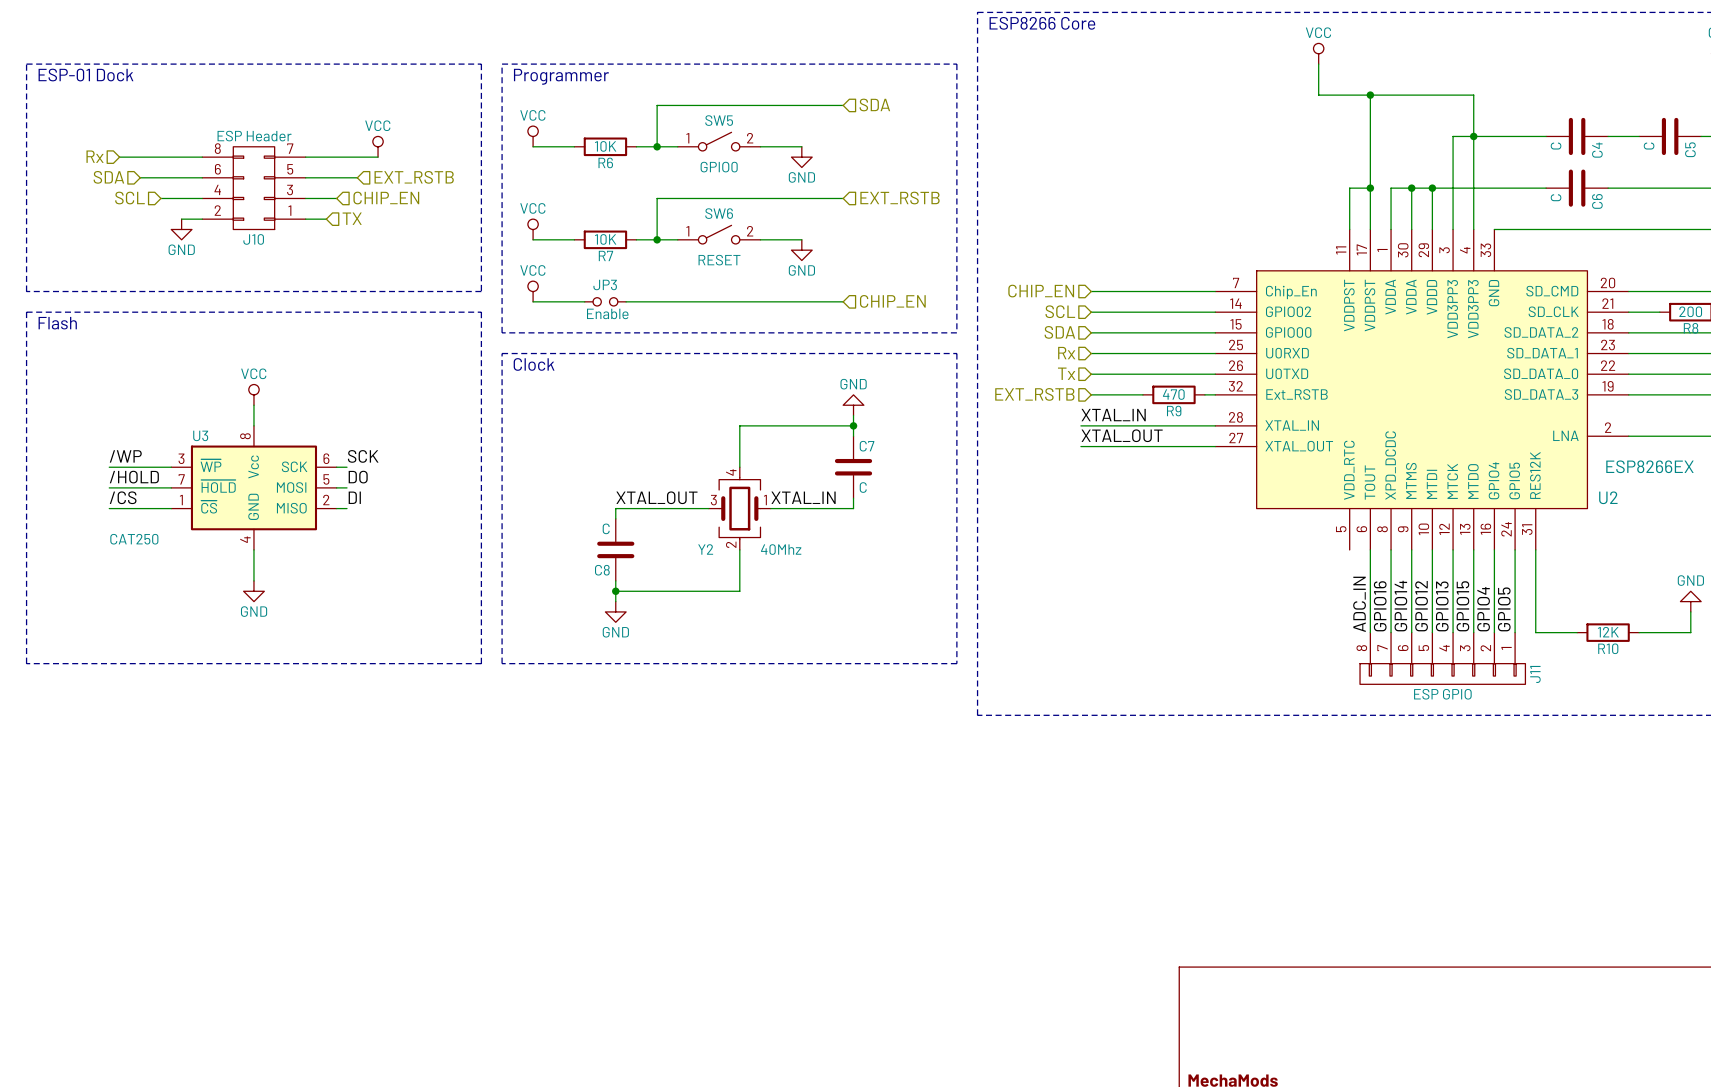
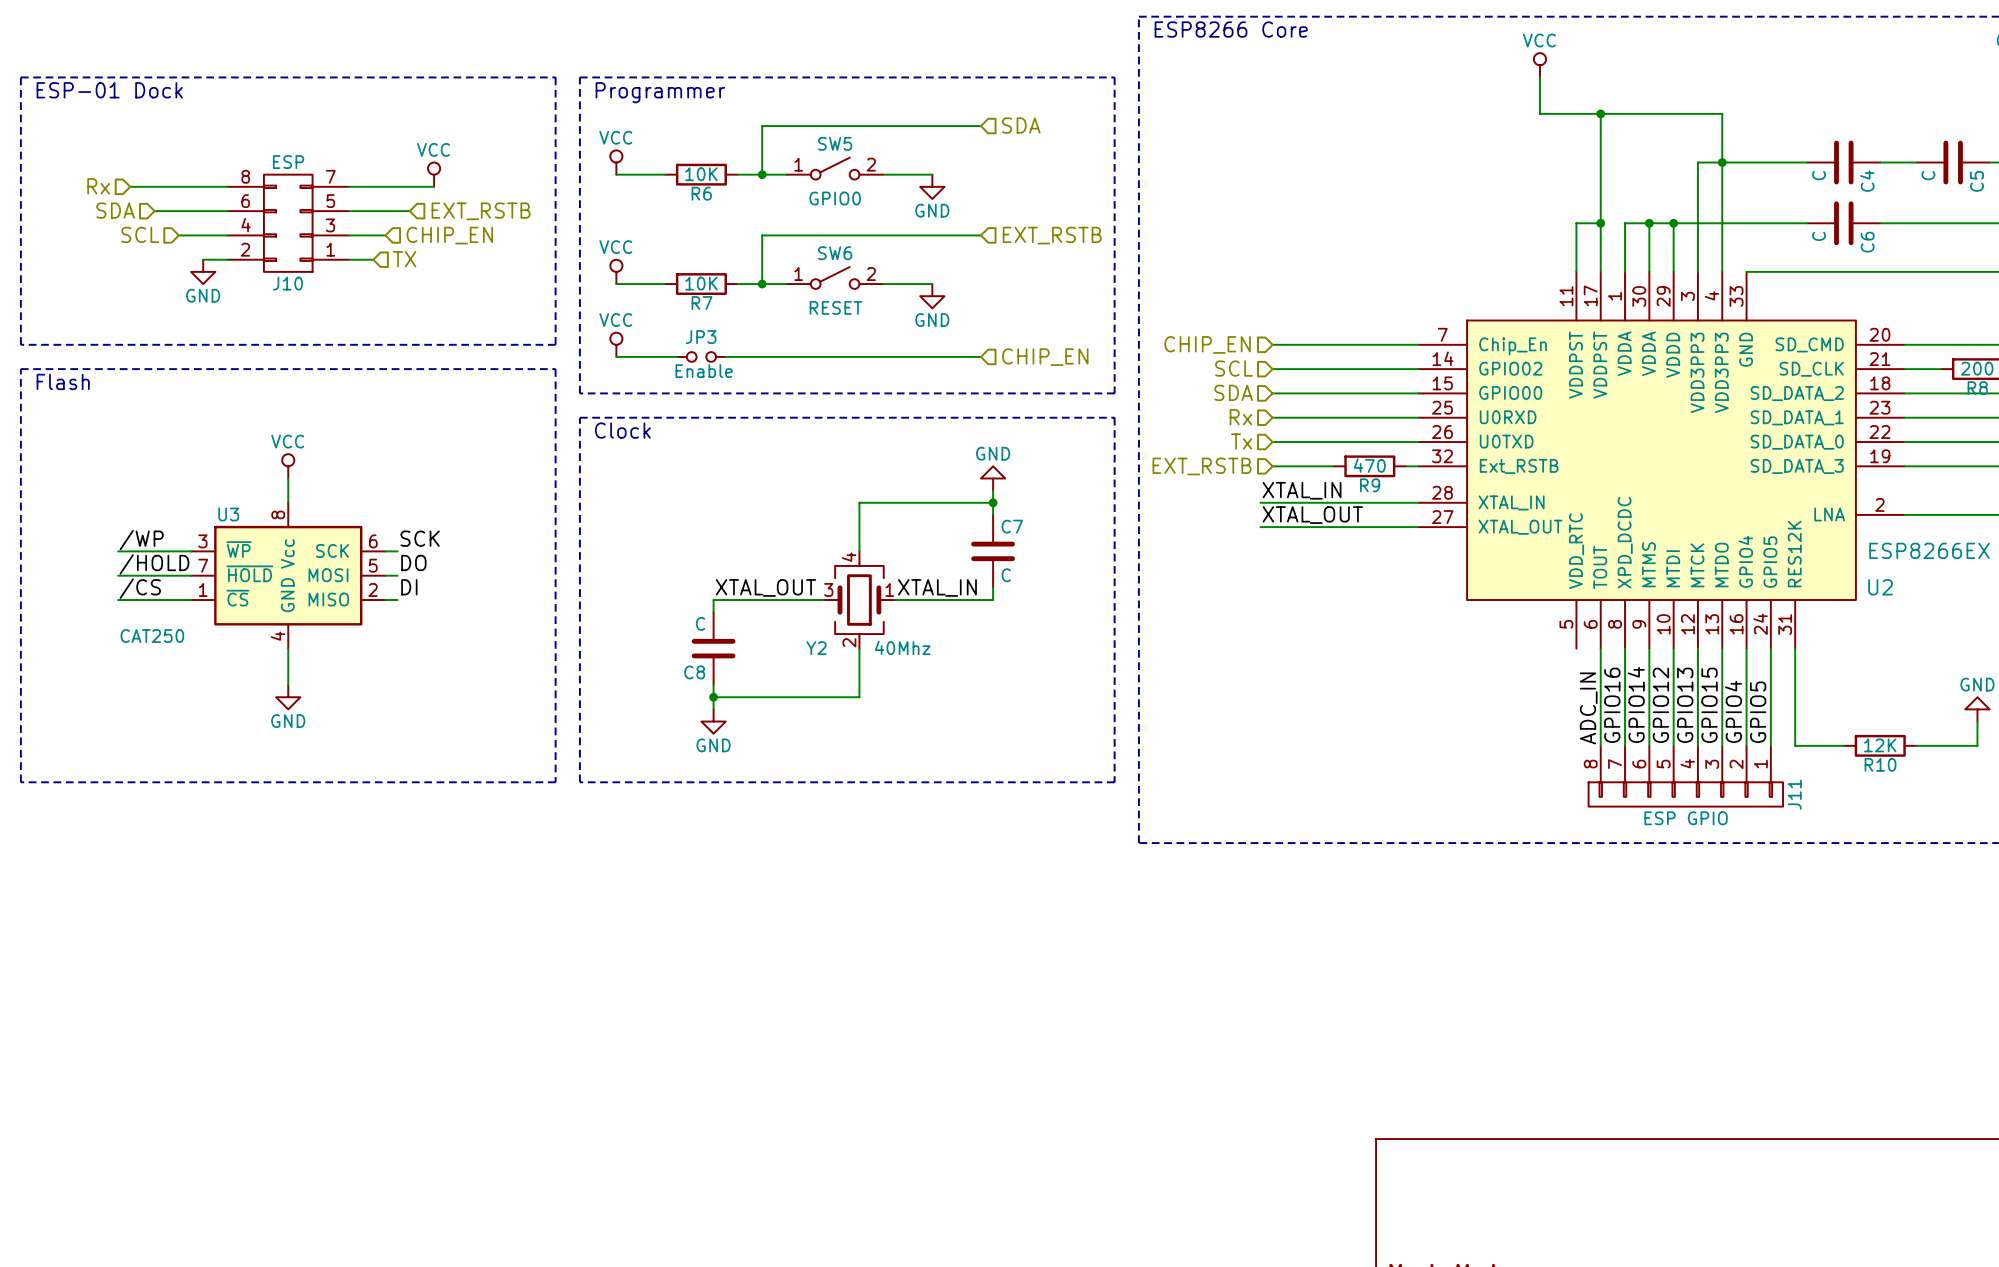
J10 value: ESP Header (254, 136) -> ESP (288, 162)

